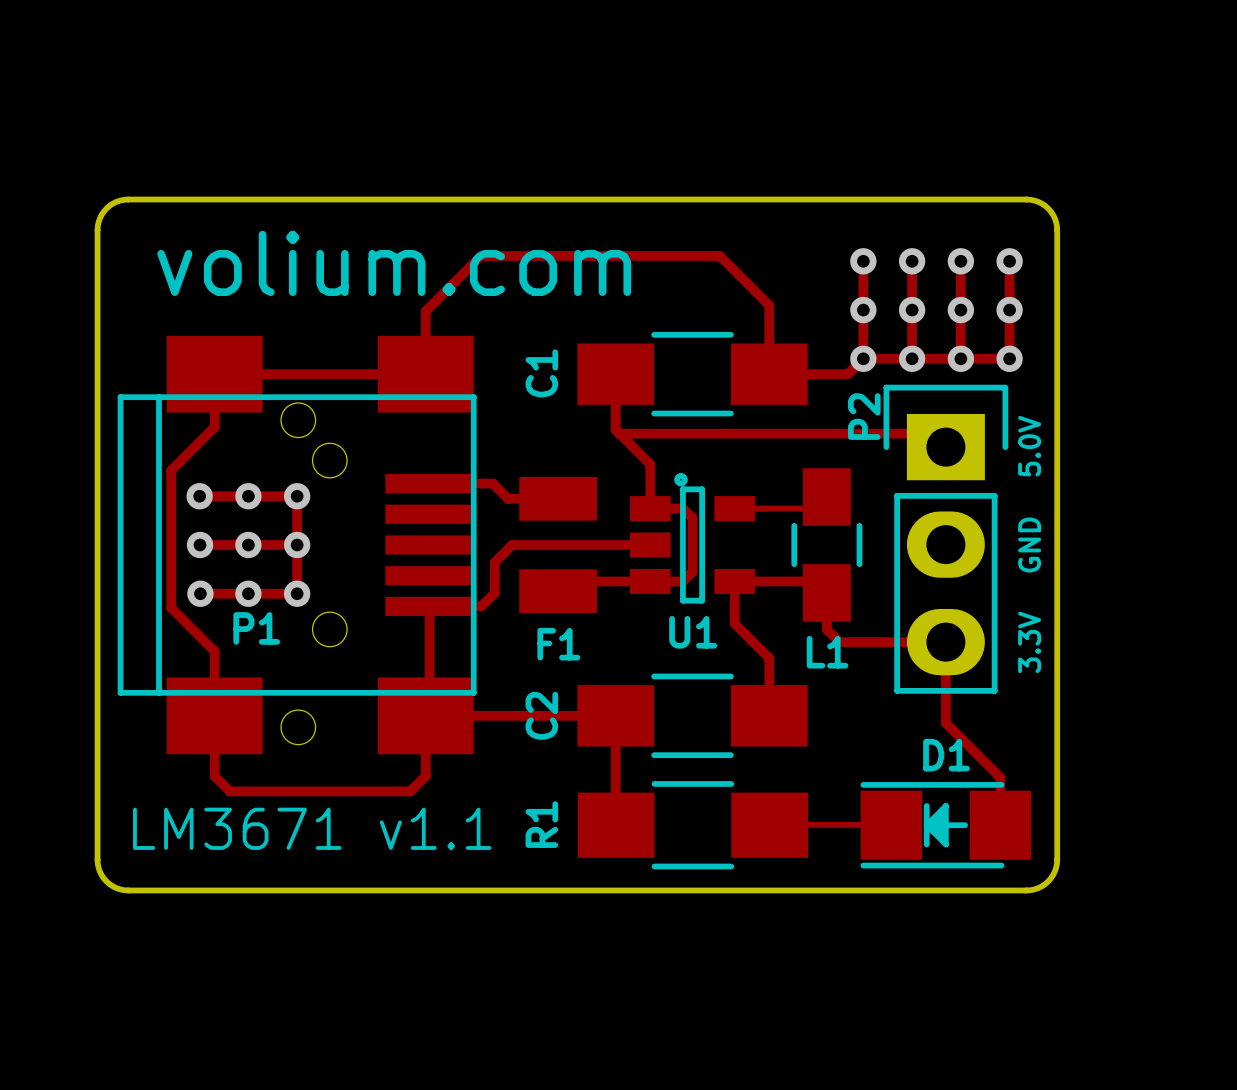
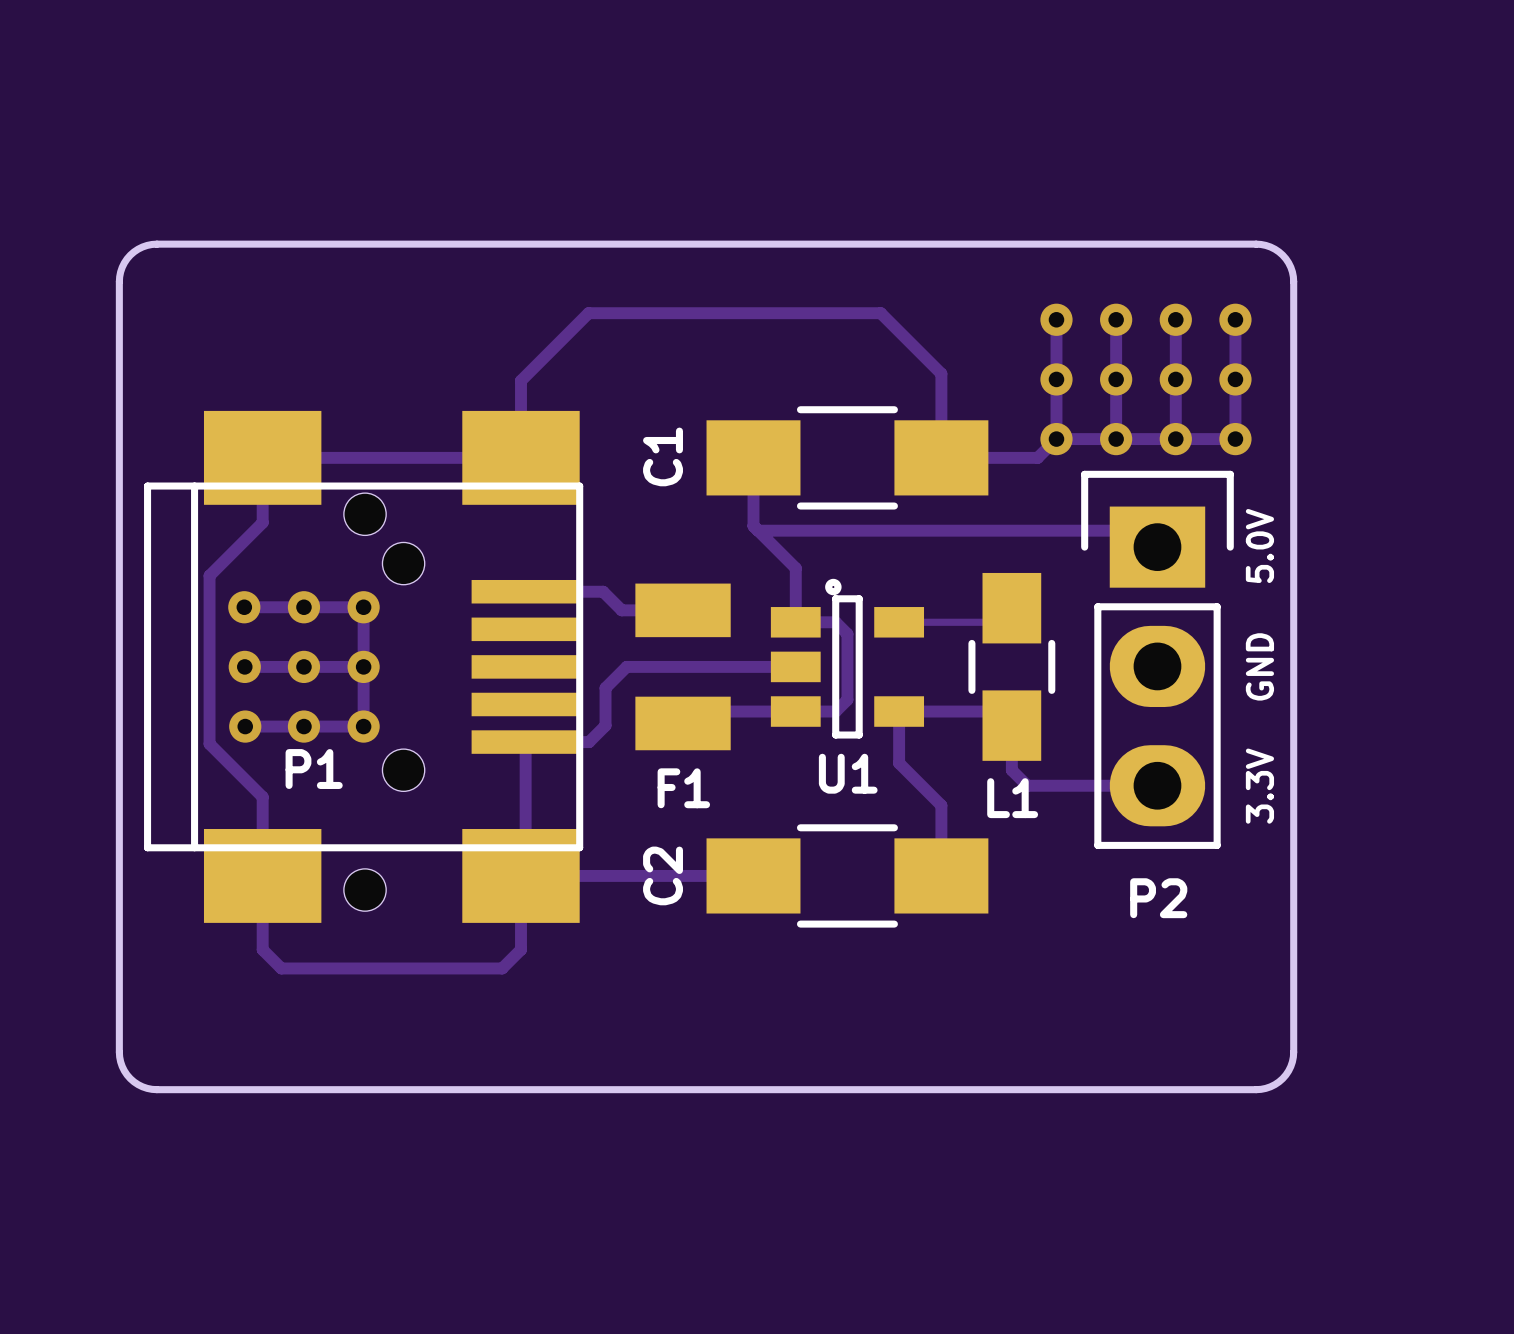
text: volium.com (394, 263) -> none
P2 name rotation: 0° (864, 416) -> 90° clockwise (1158, 898)
P2 name position: P2 (864, 416) -> P2 (1158, 898)
track: (945, 642) (945, 723) (1000, 777) (1000, 825) -> none
track: (615, 715) (615, 824) -> none
track: (769, 824) (891, 824) -> none
R1: (692, 825) -> none
D1: (945, 825) -> none
text: LM3671 v1.1 (312, 828) -> none

